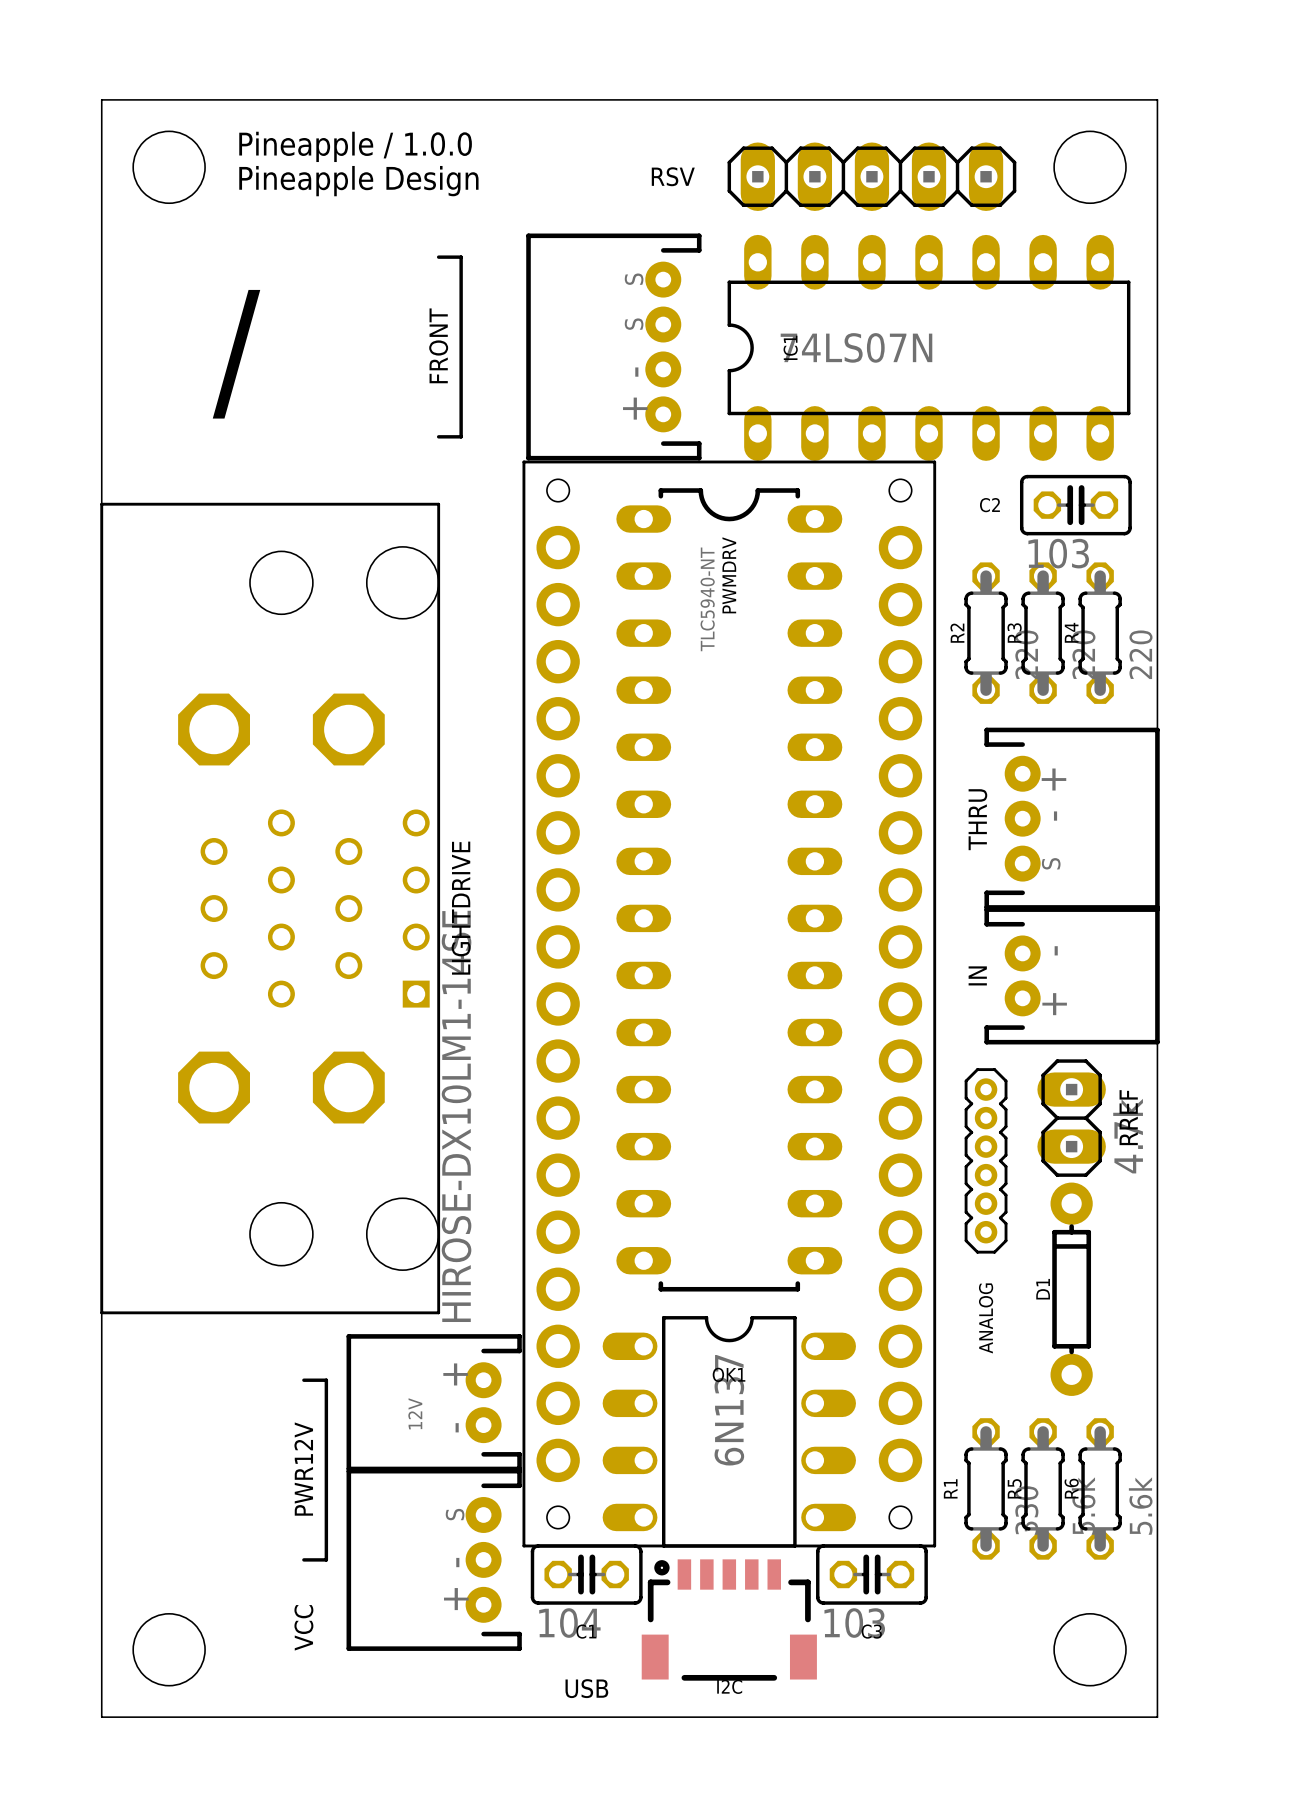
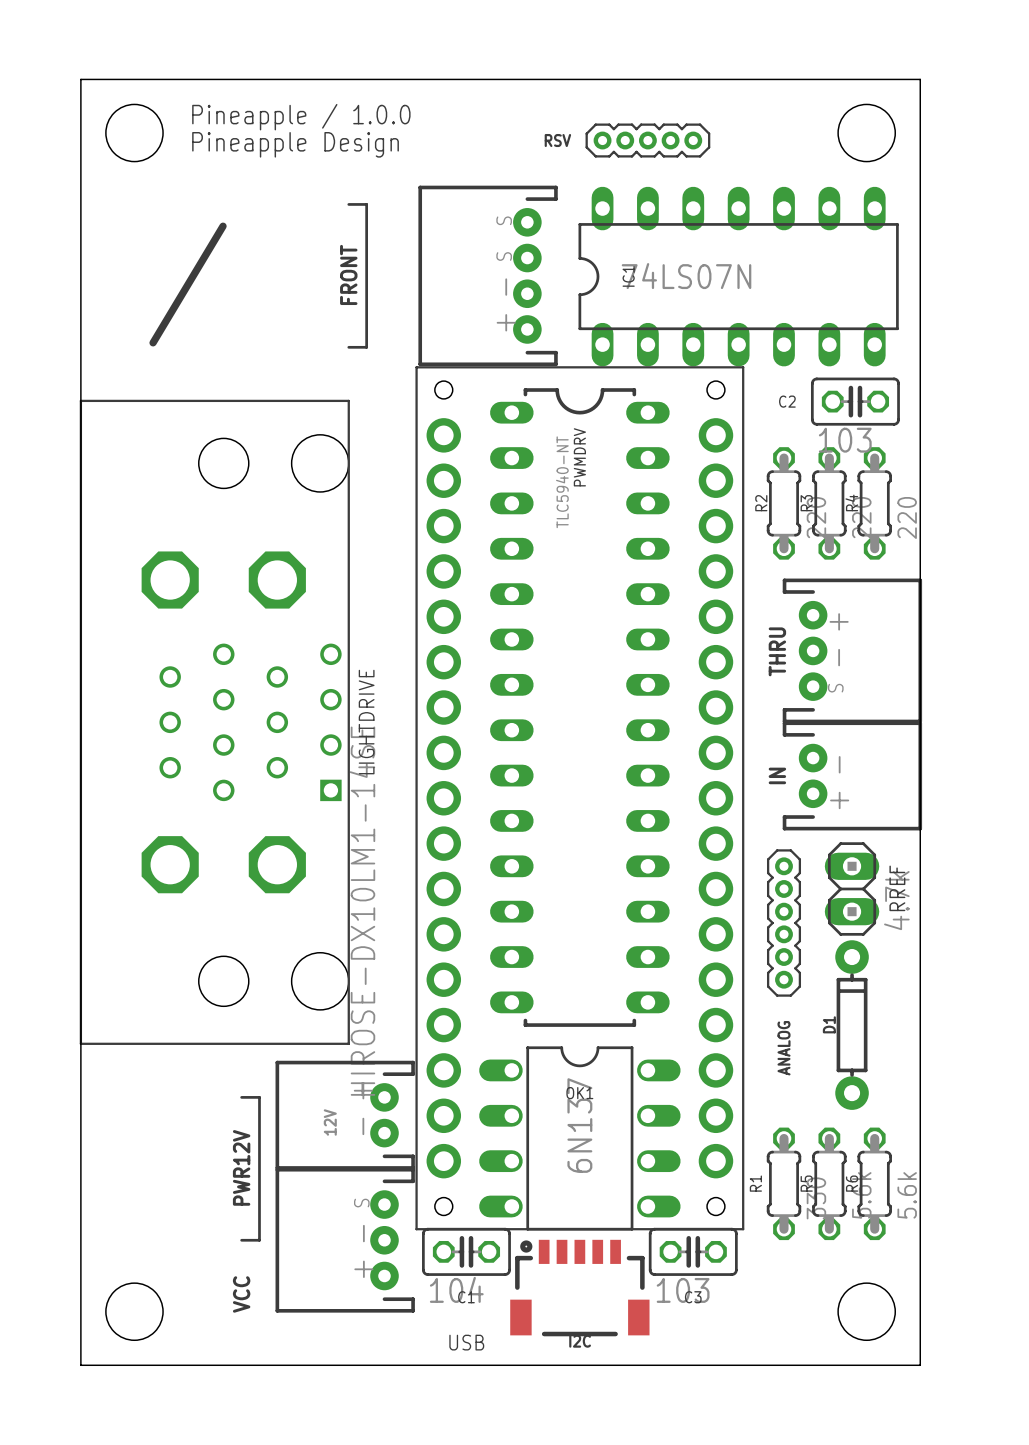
RSV: none -> (647, 140)
RSV: (871, 176) -> none

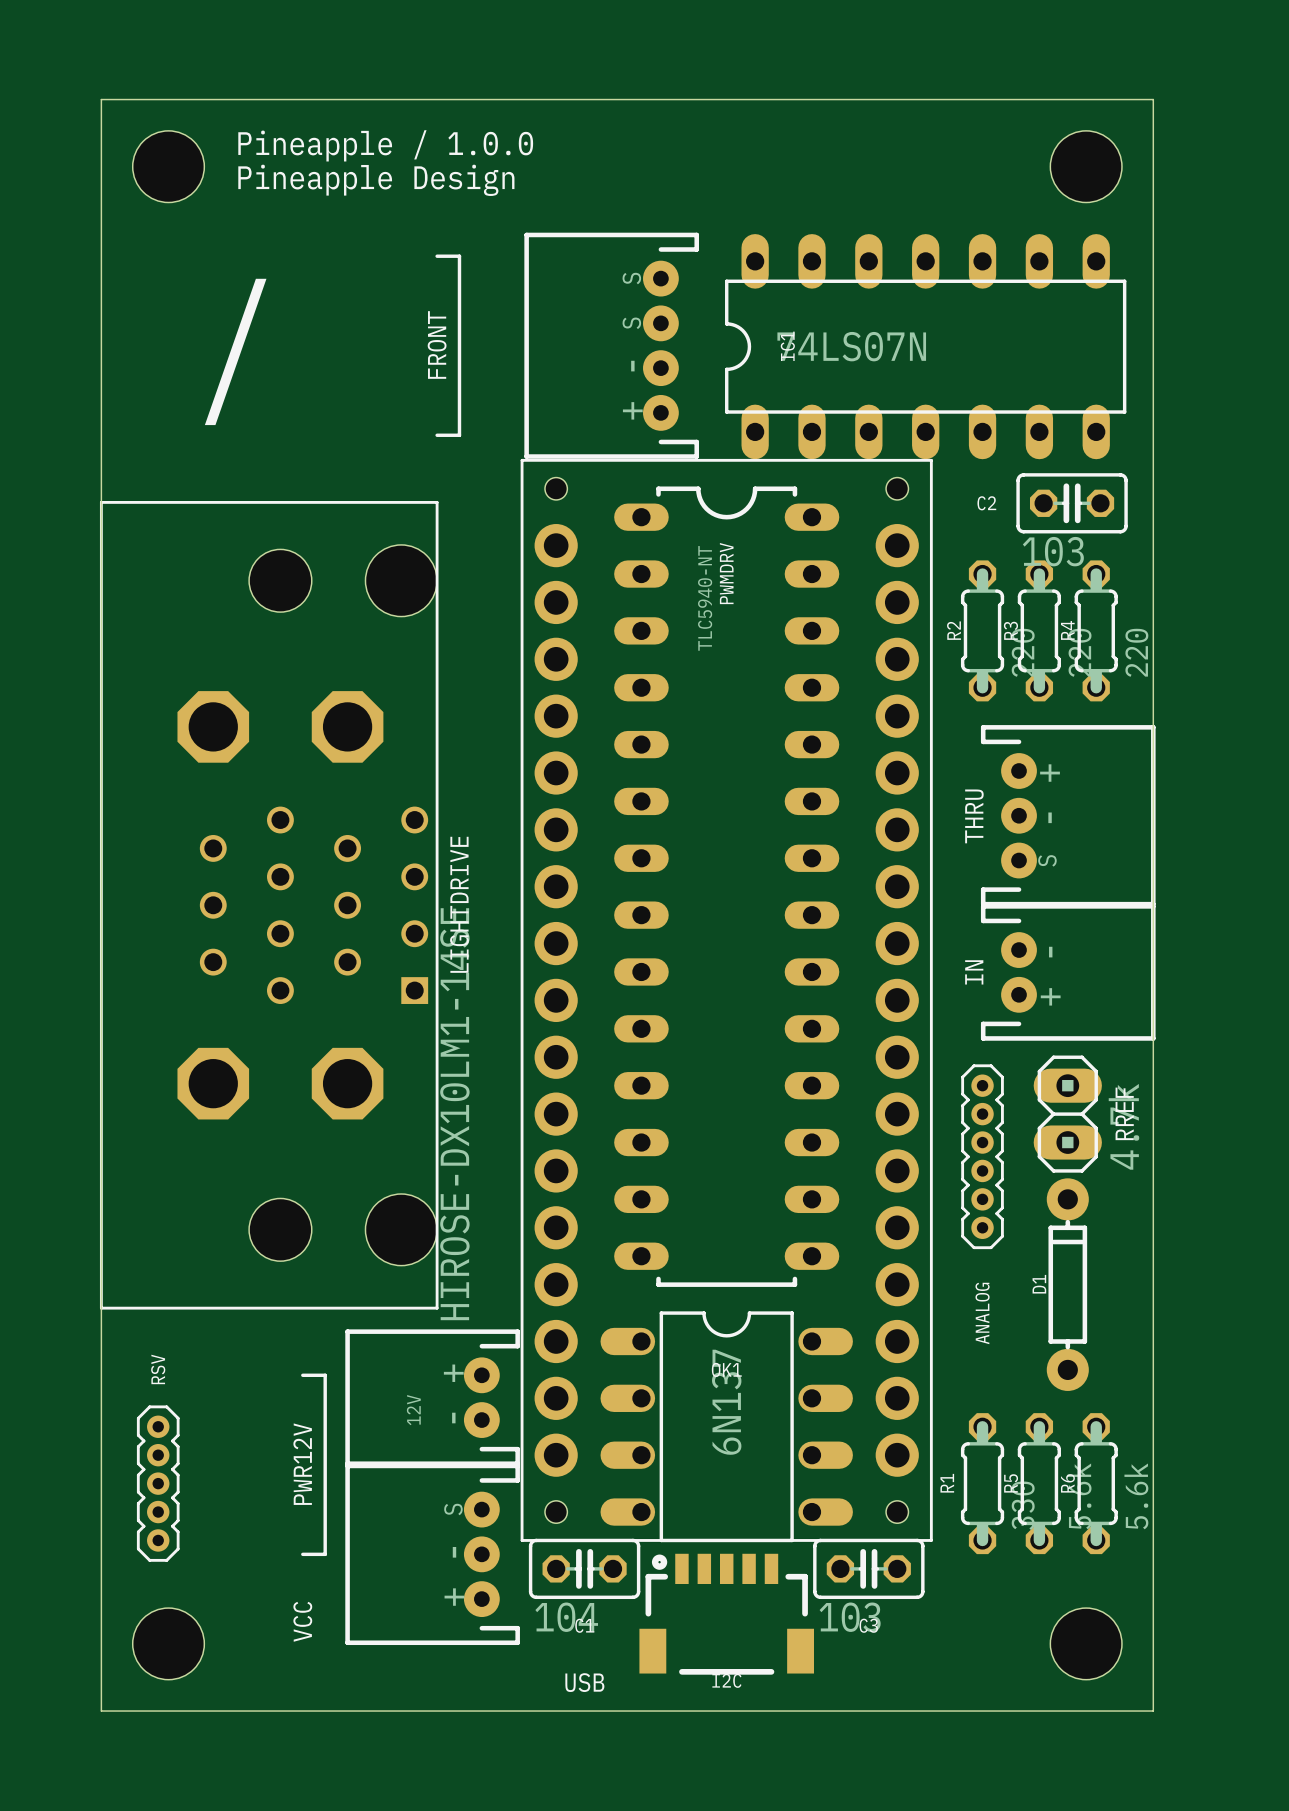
RSV: (647, 140) -> none
RSV: none -> (158, 1483)

